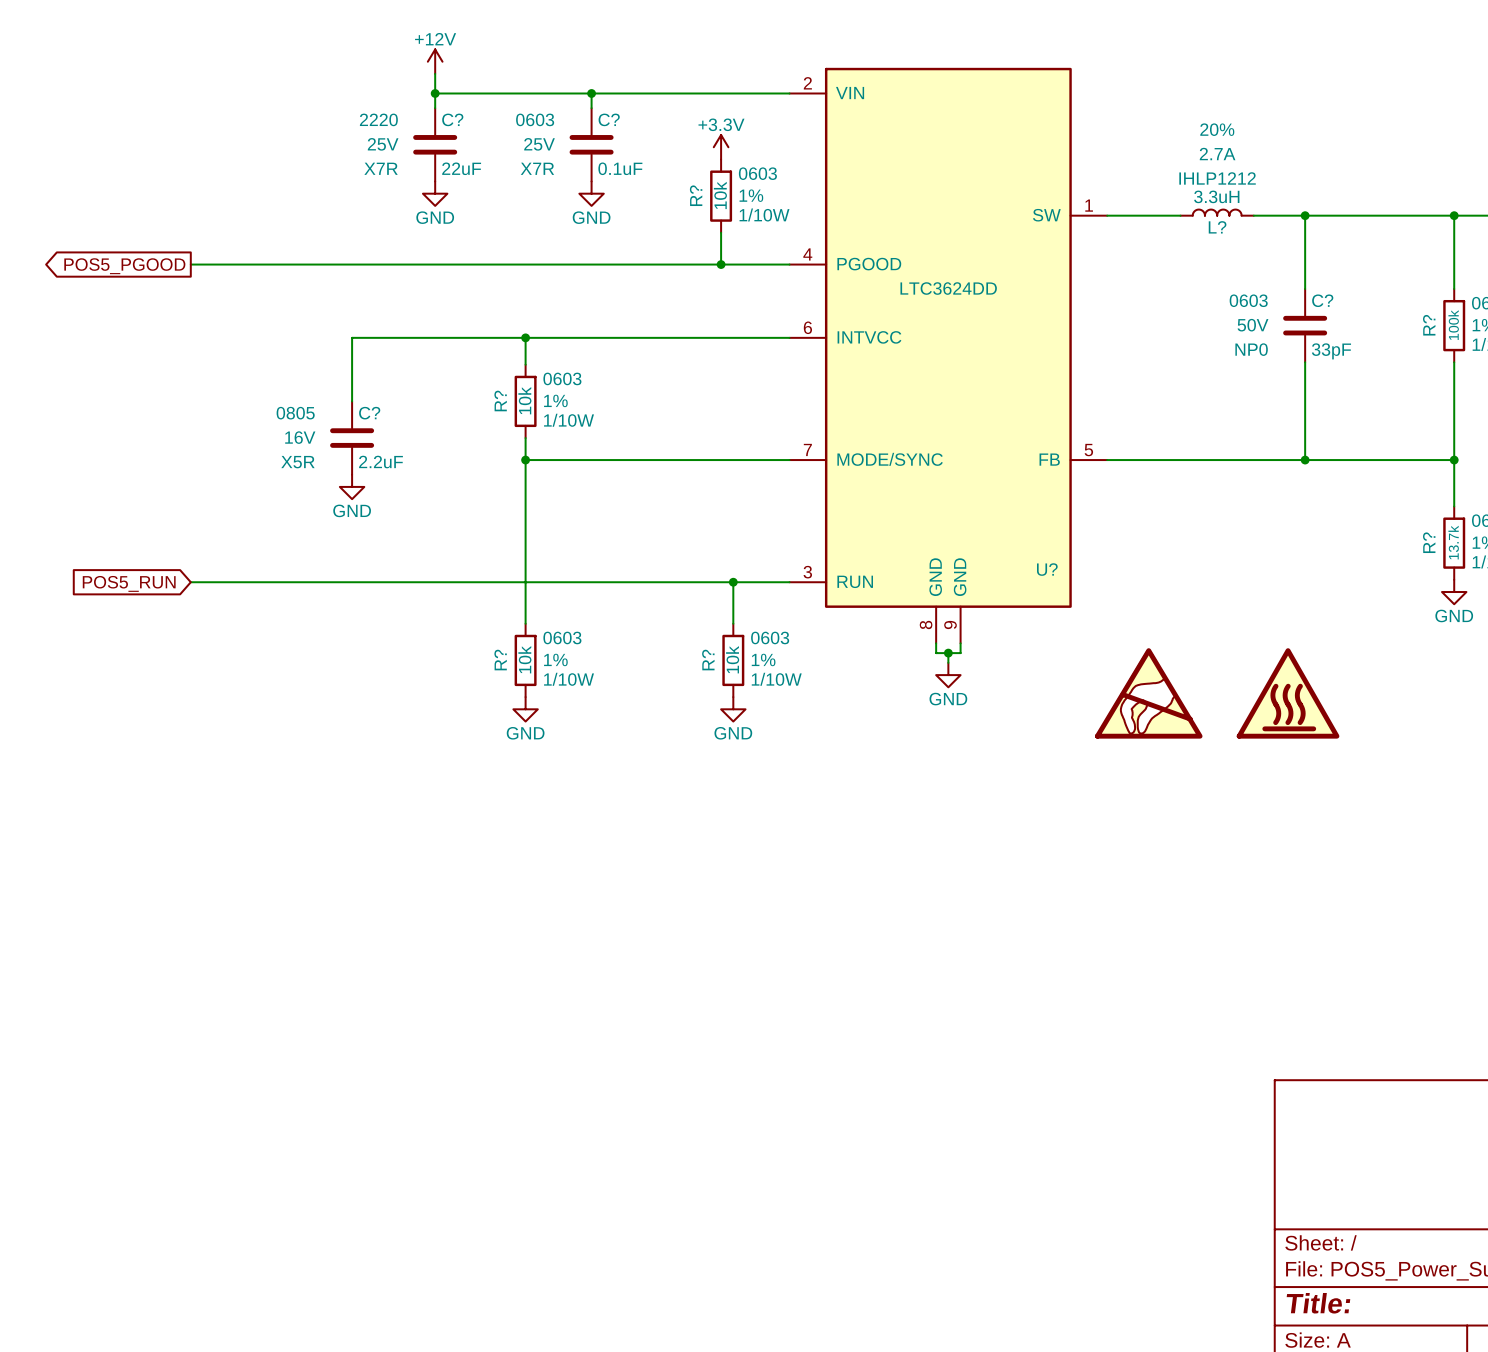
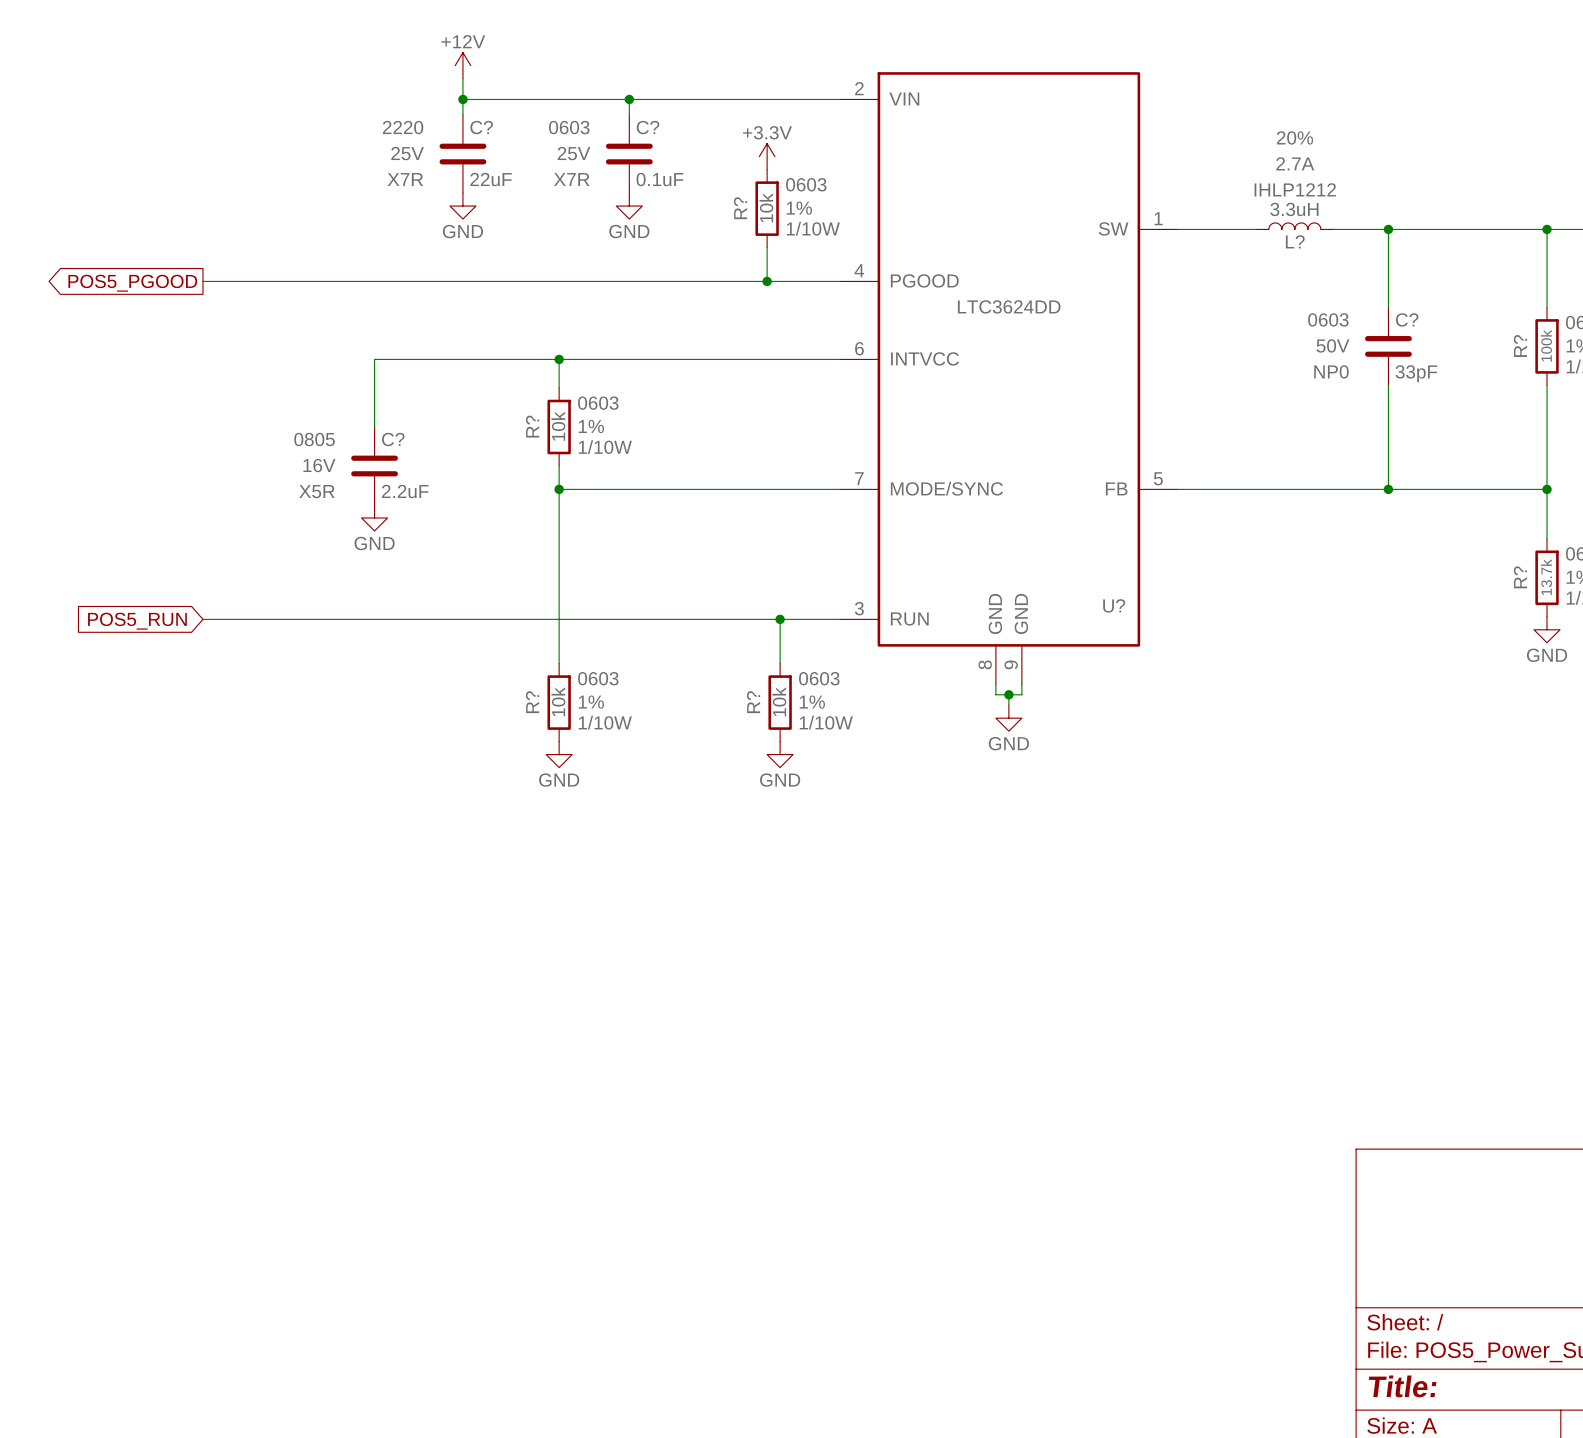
power symbol: (1148, 693) -> none
power symbol: (1288, 693) -> none

